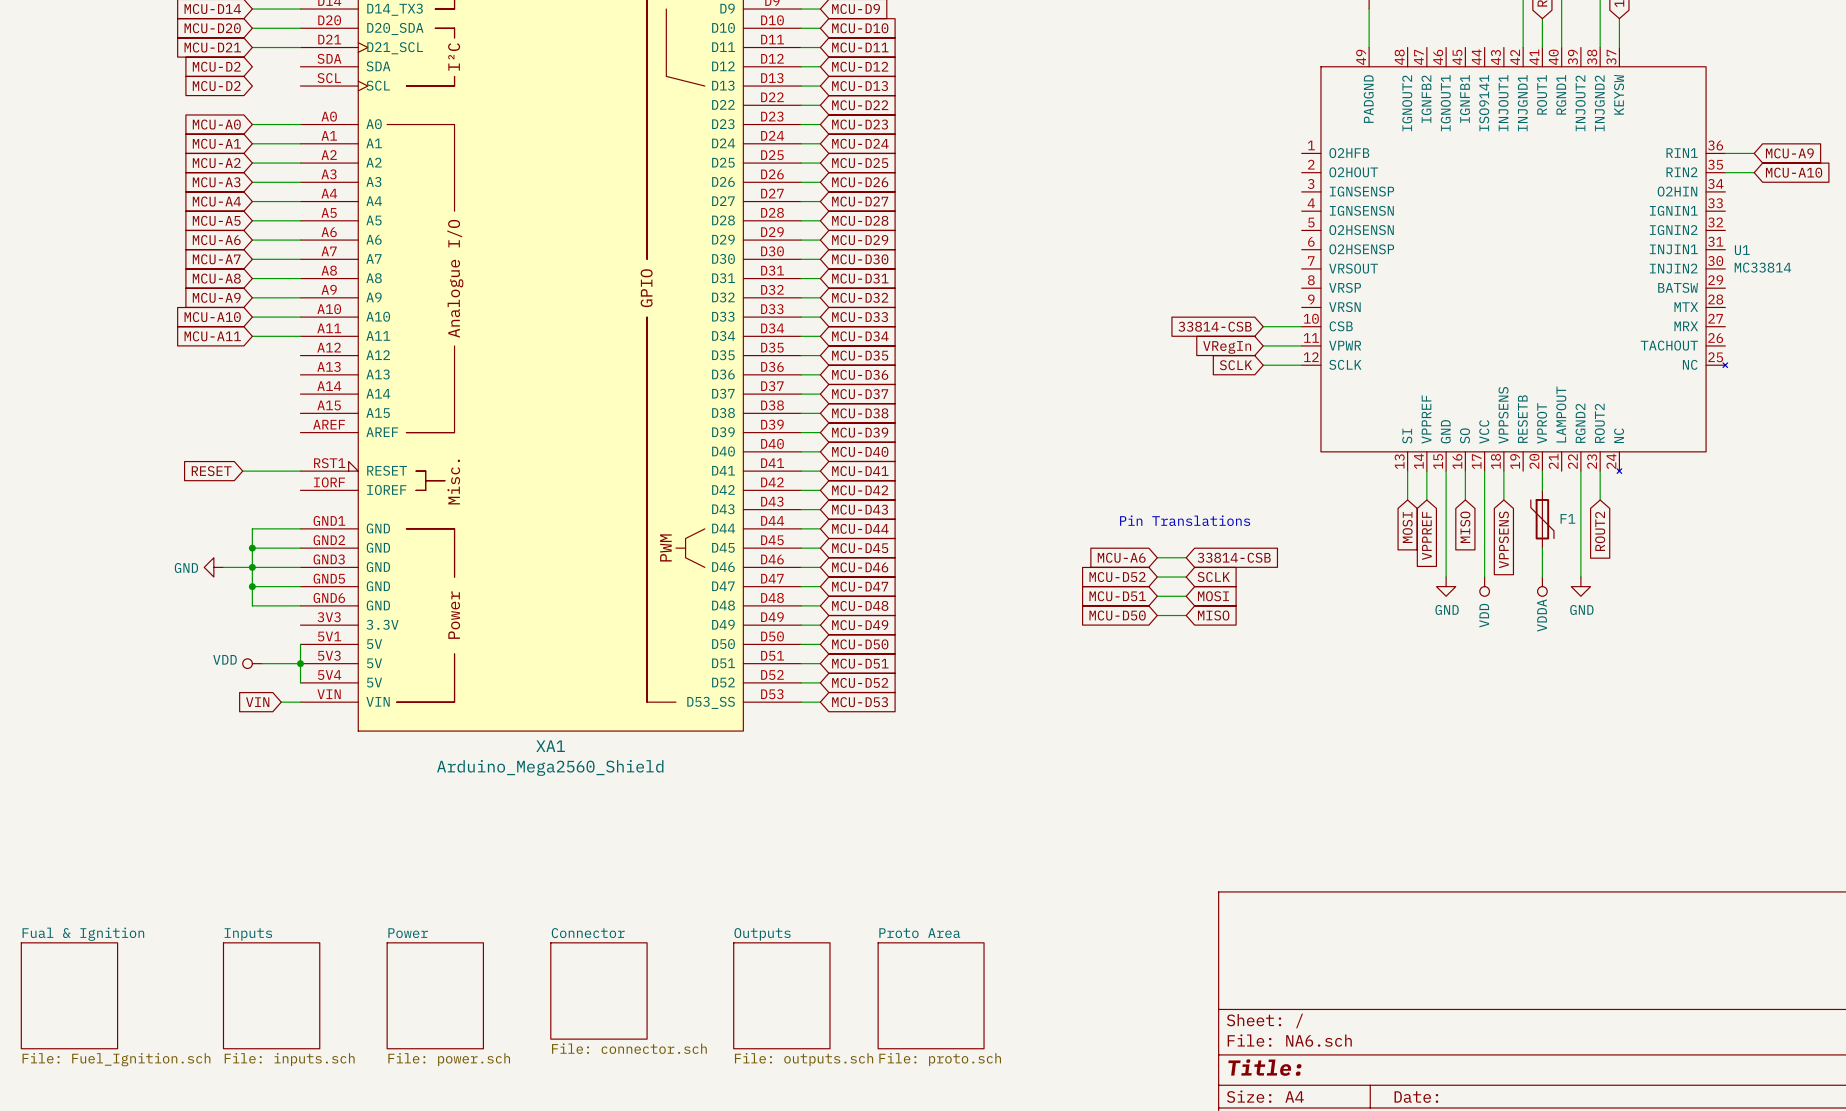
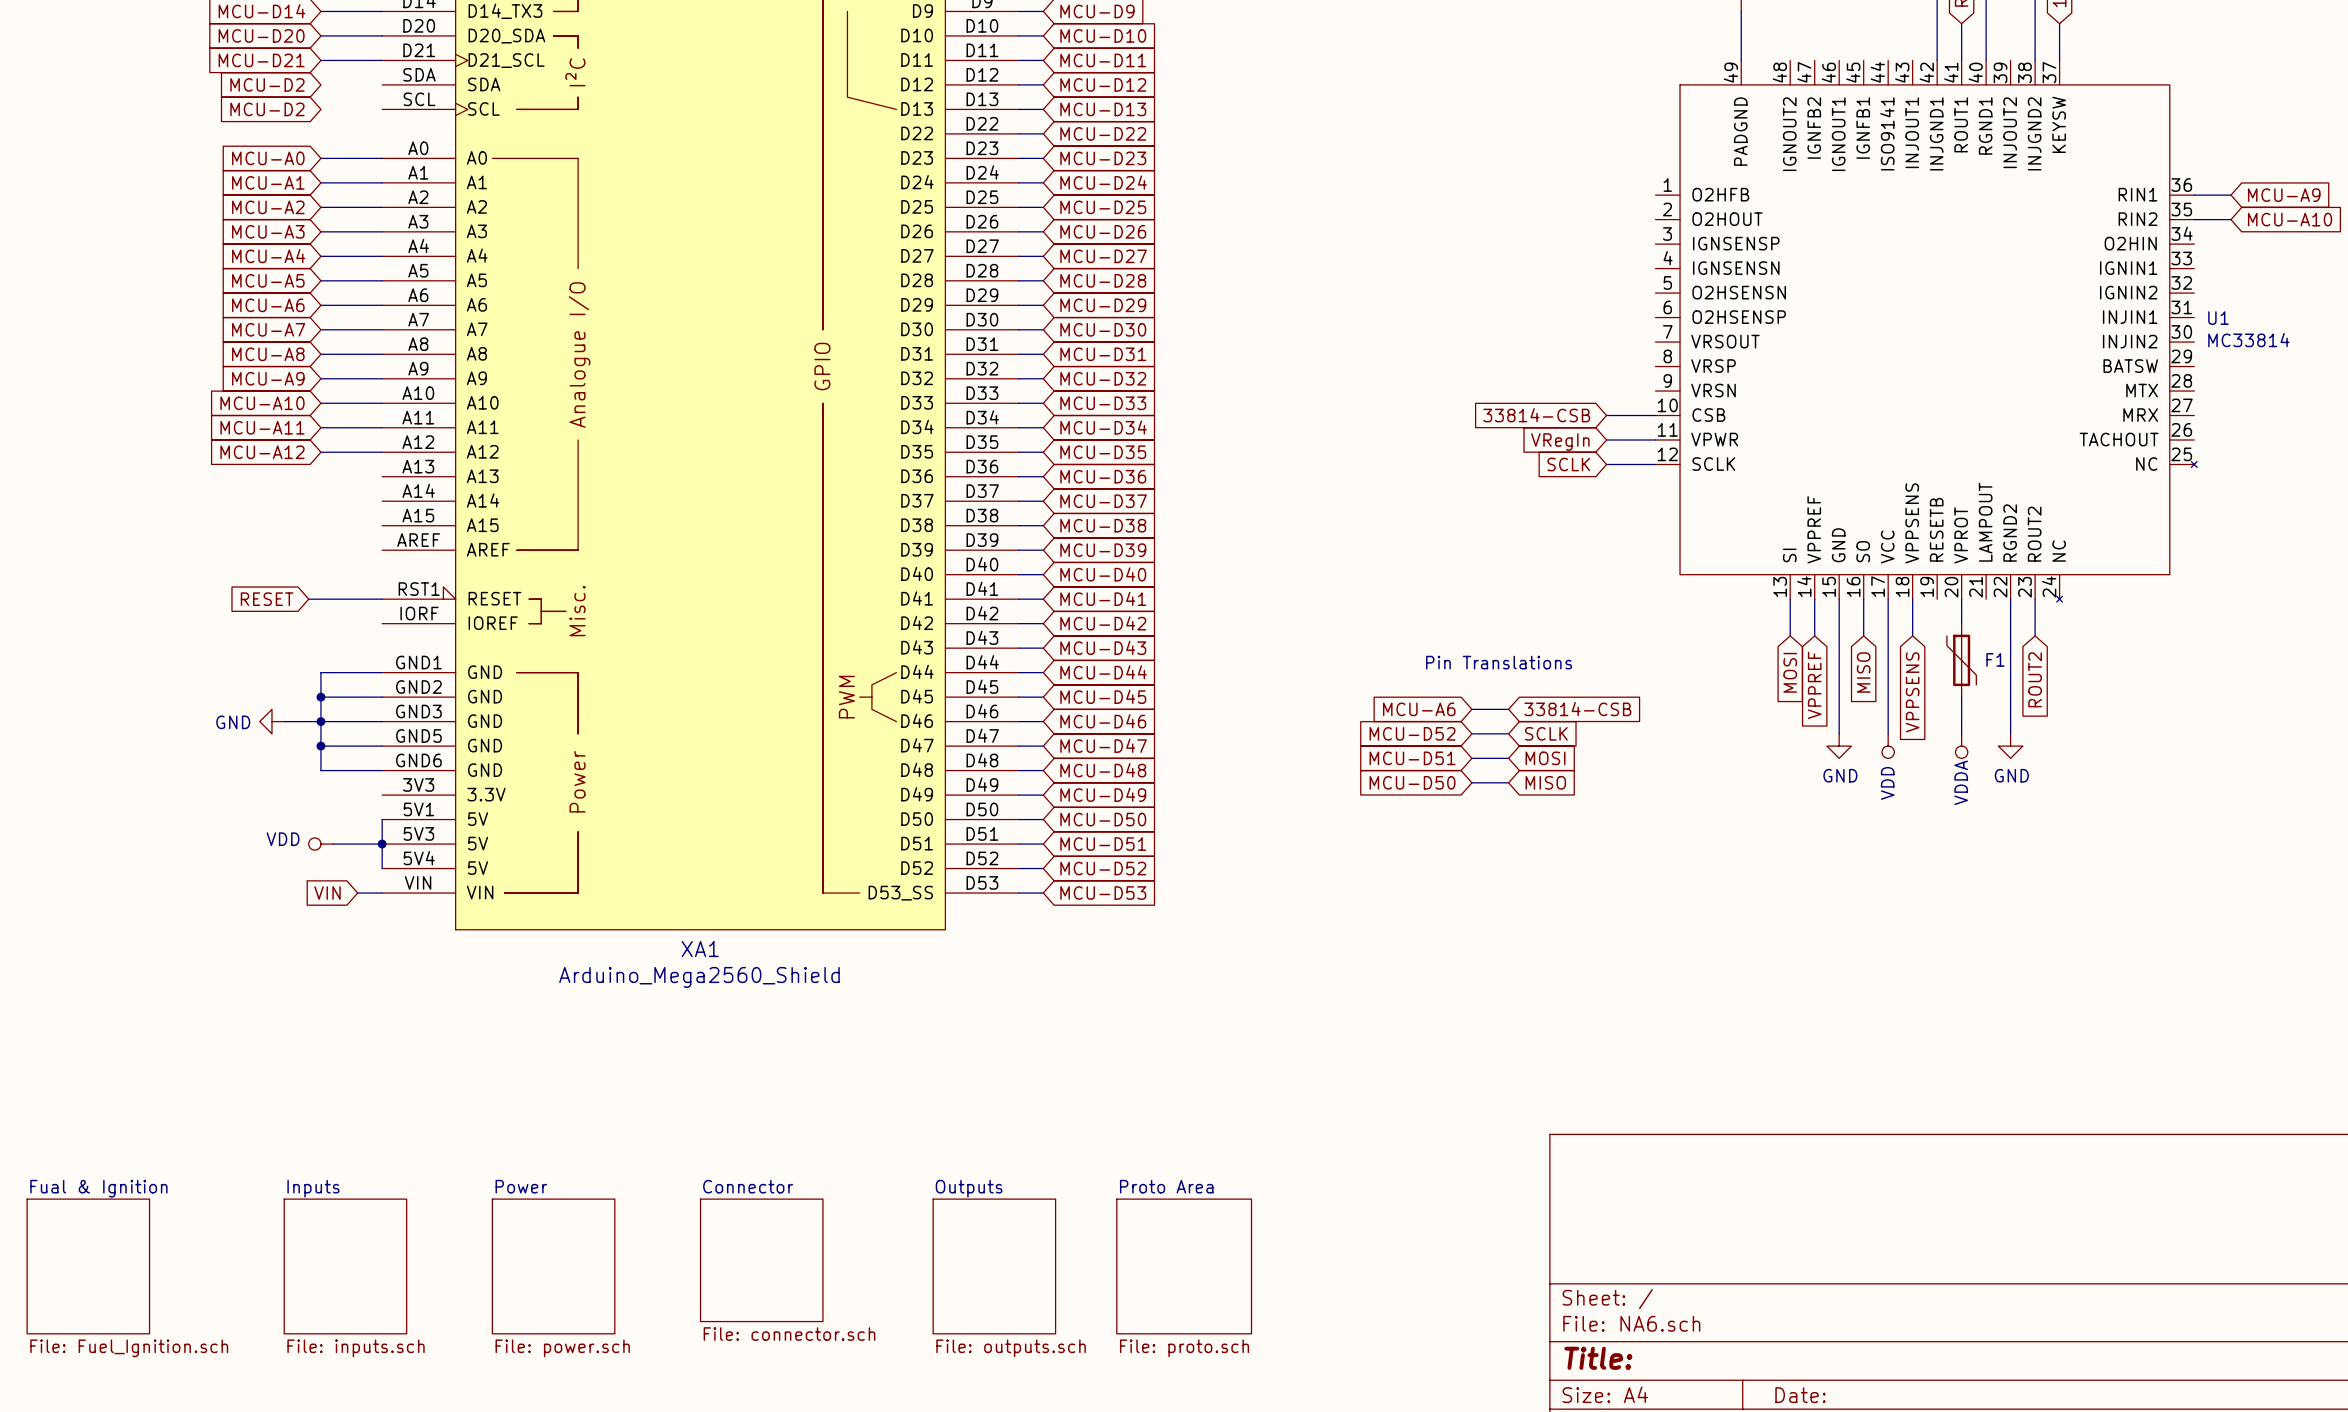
global label: none -> MCU-A12 (262, 452)
wire: none -> (320, 452) (382, 452)

